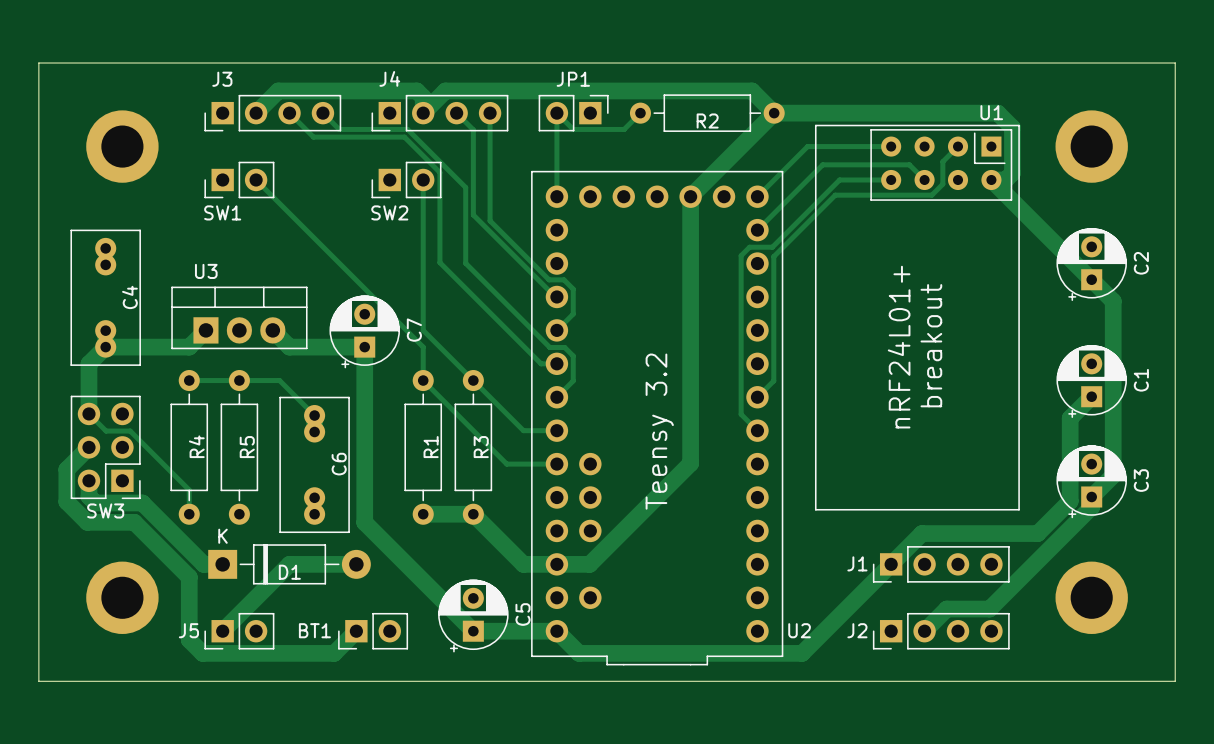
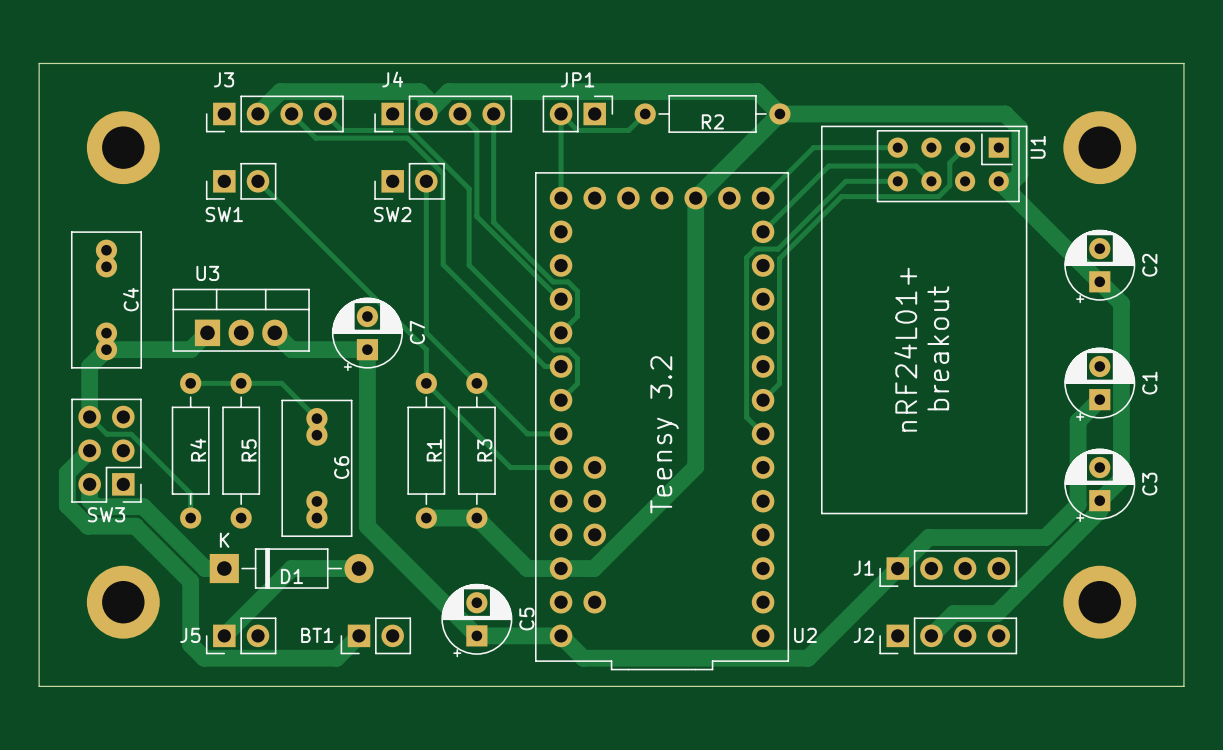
U1 name rotation: 0° (991, 112) -> 90° counterclockwise (1038, 147)
U1 name position: U1 (991, 112) -> U1 (1038, 147)

